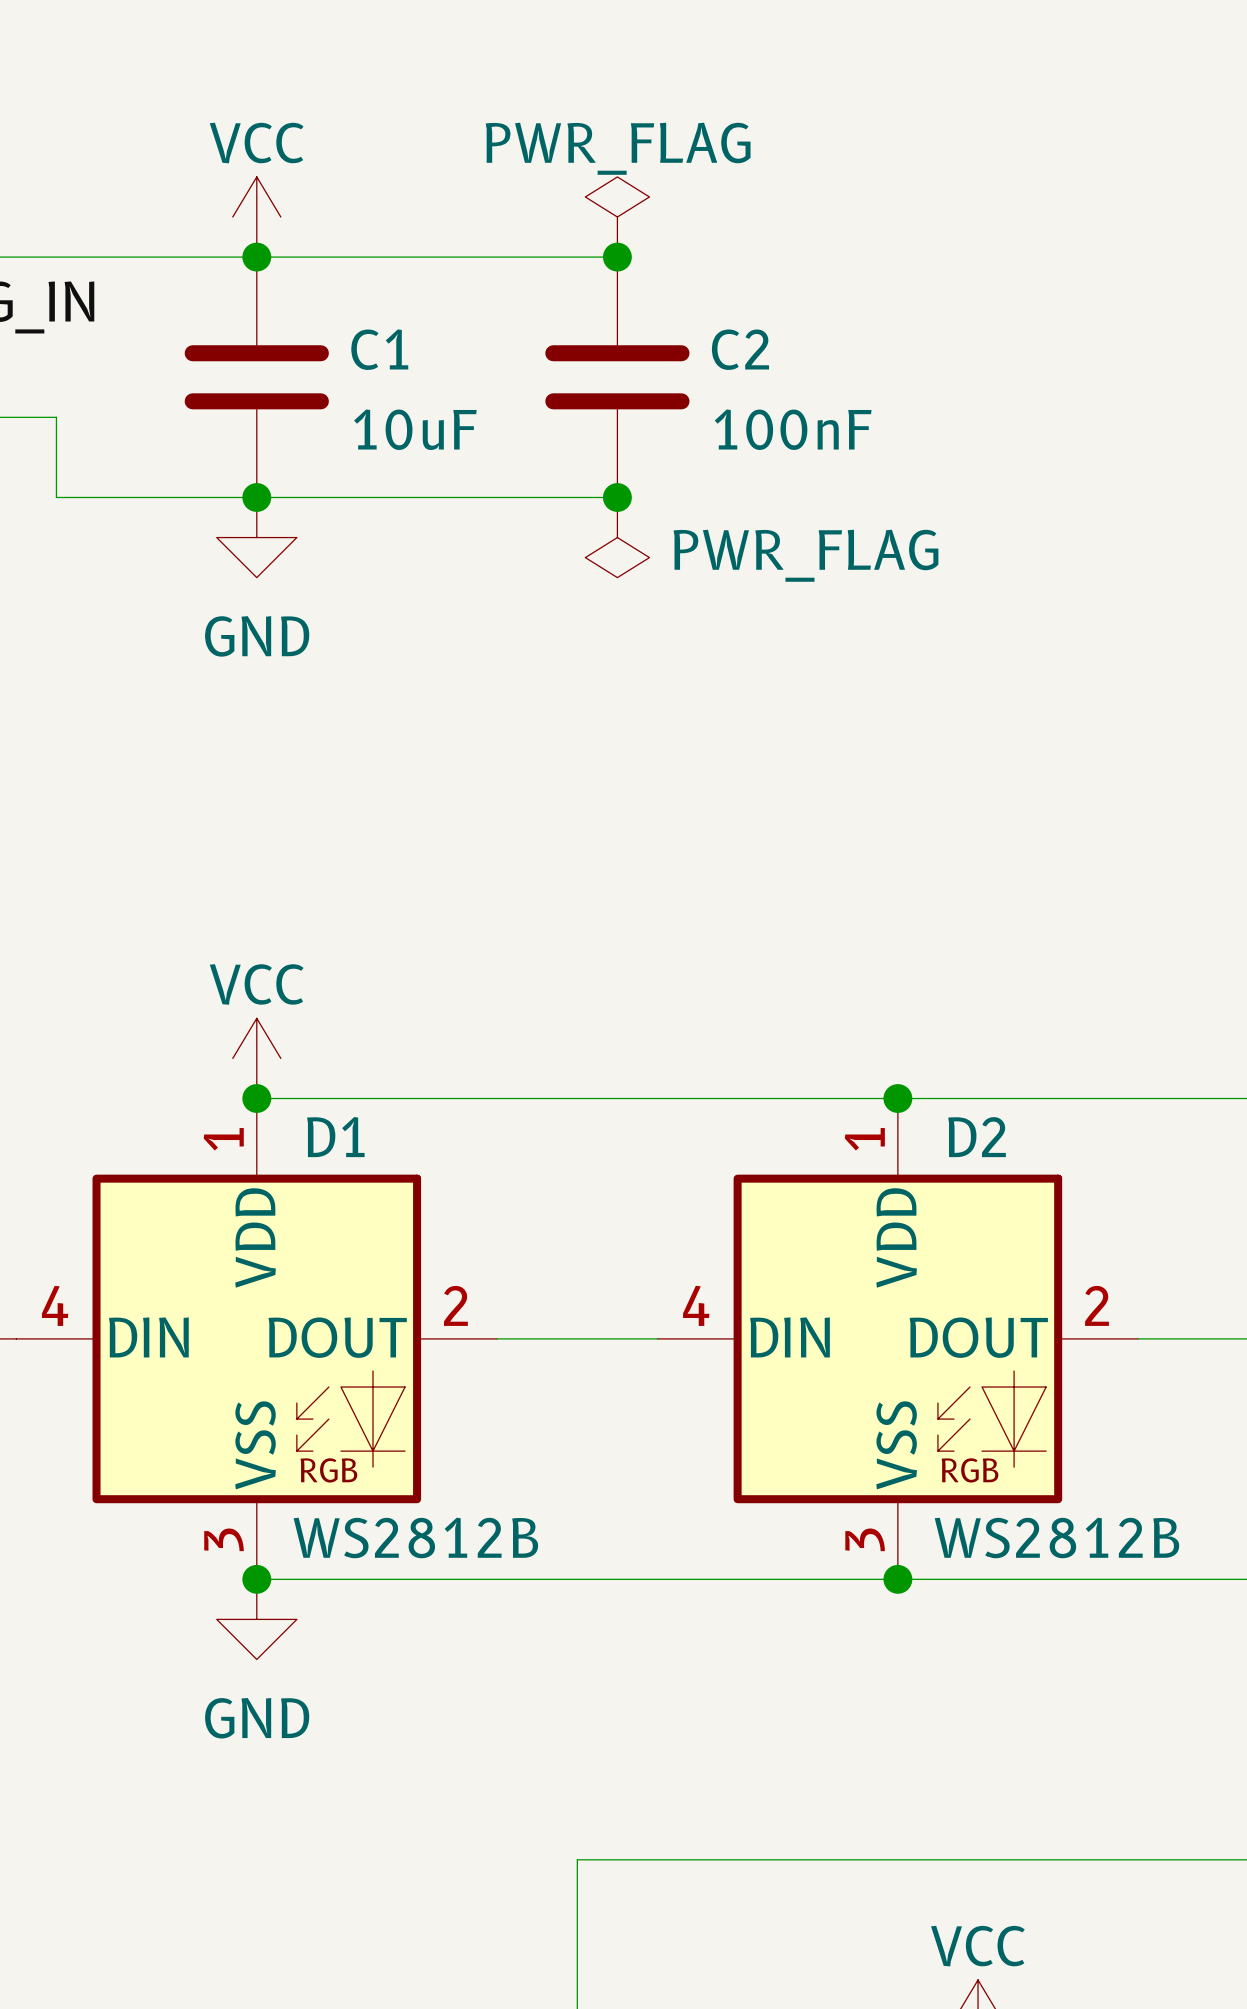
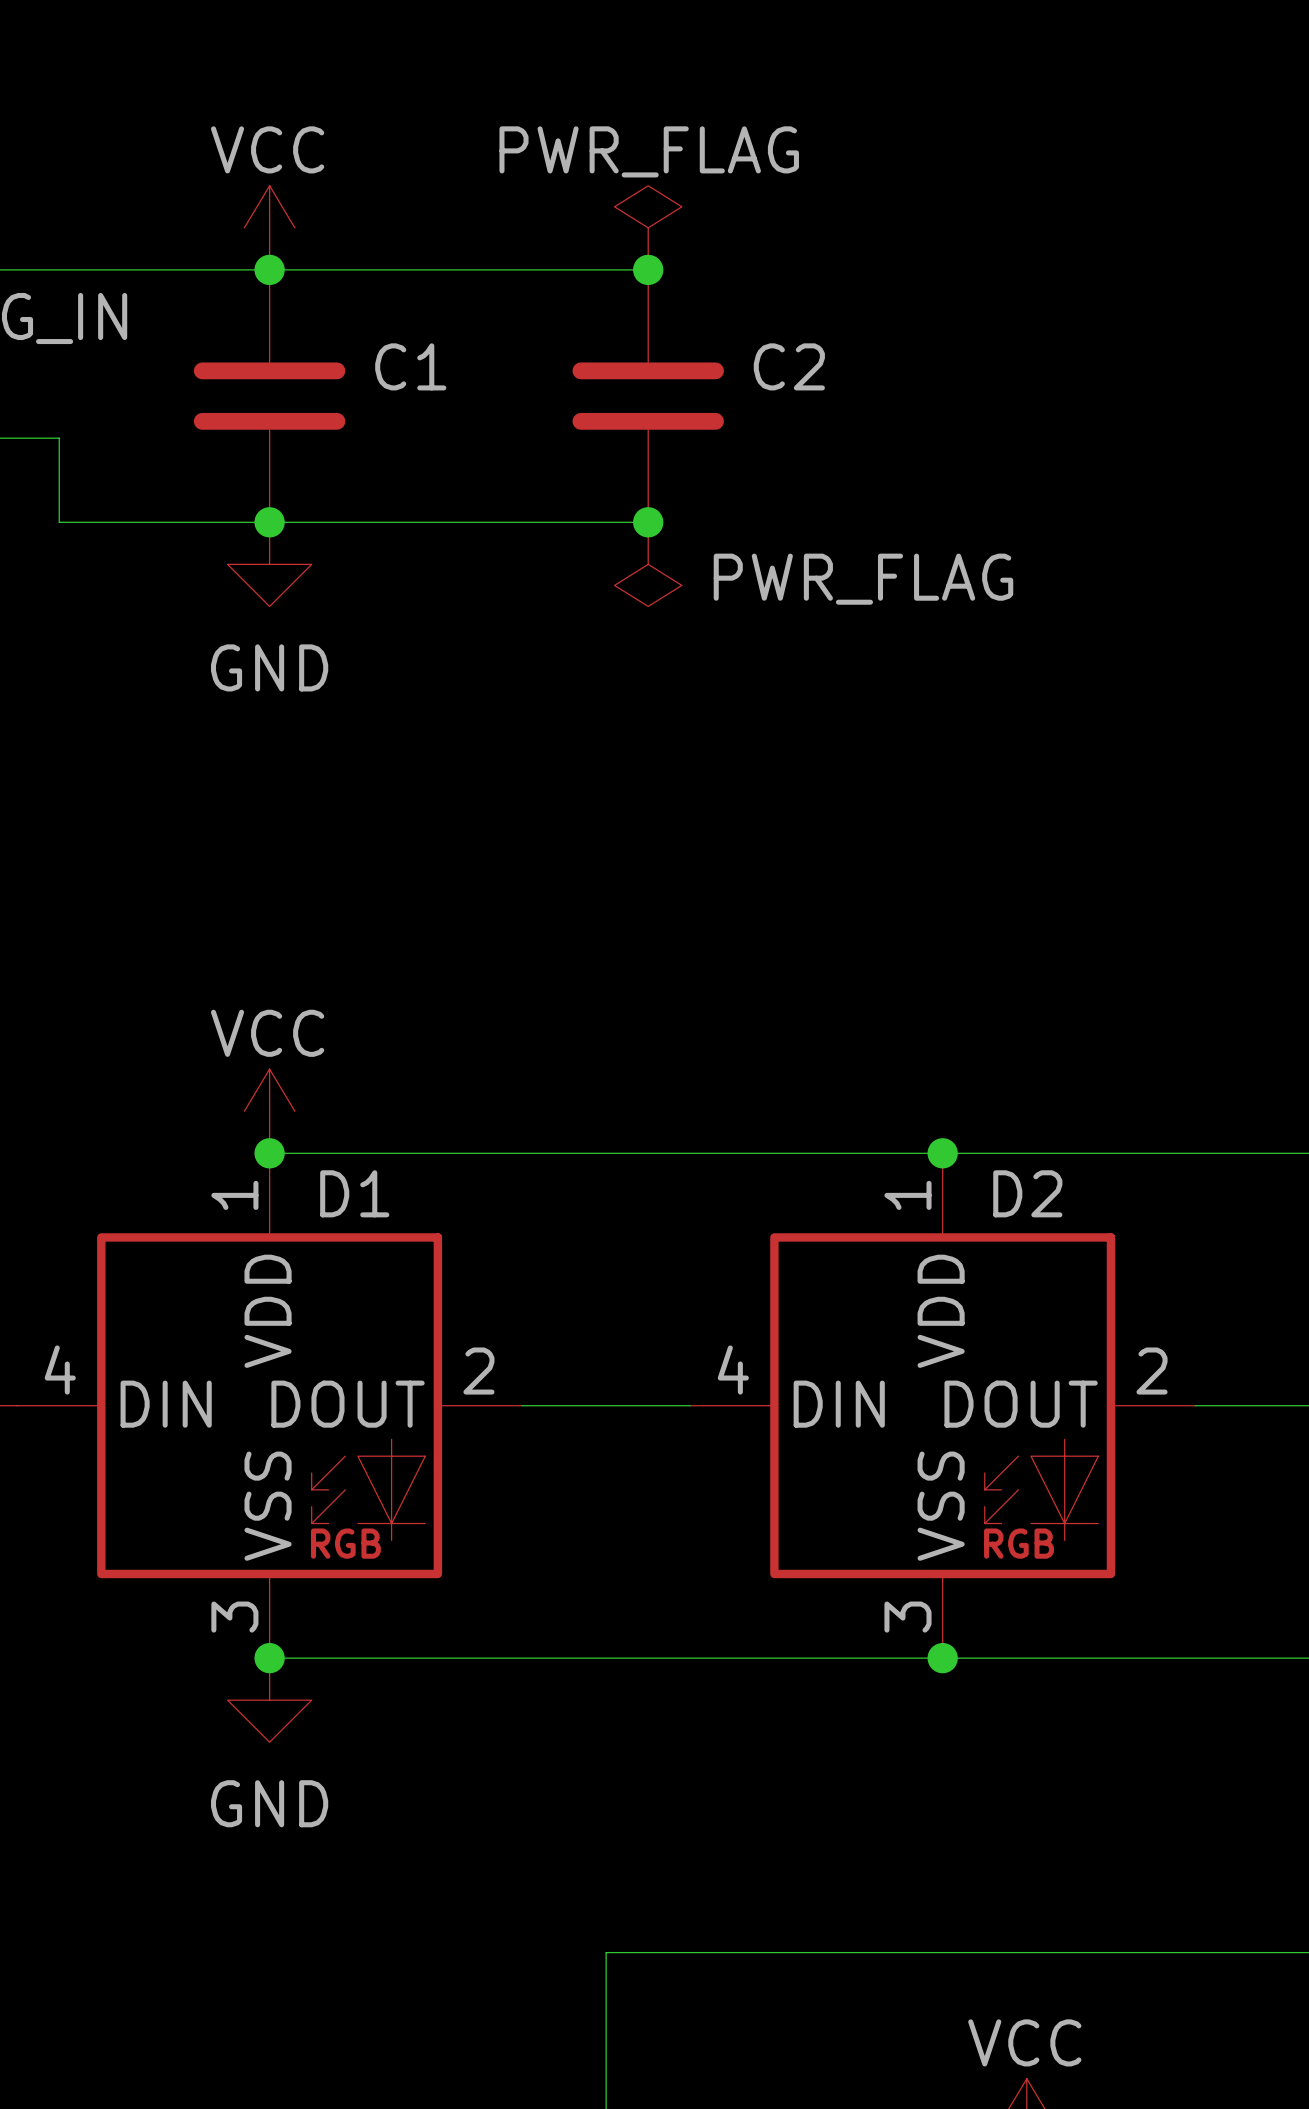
C1 value: 10uF (415, 429) -> none
C2 value: 100nF (793, 429) -> none
D1 value: WS2812B (415, 1537) -> none
D2 value: WS2812B (1056, 1537) -> none

